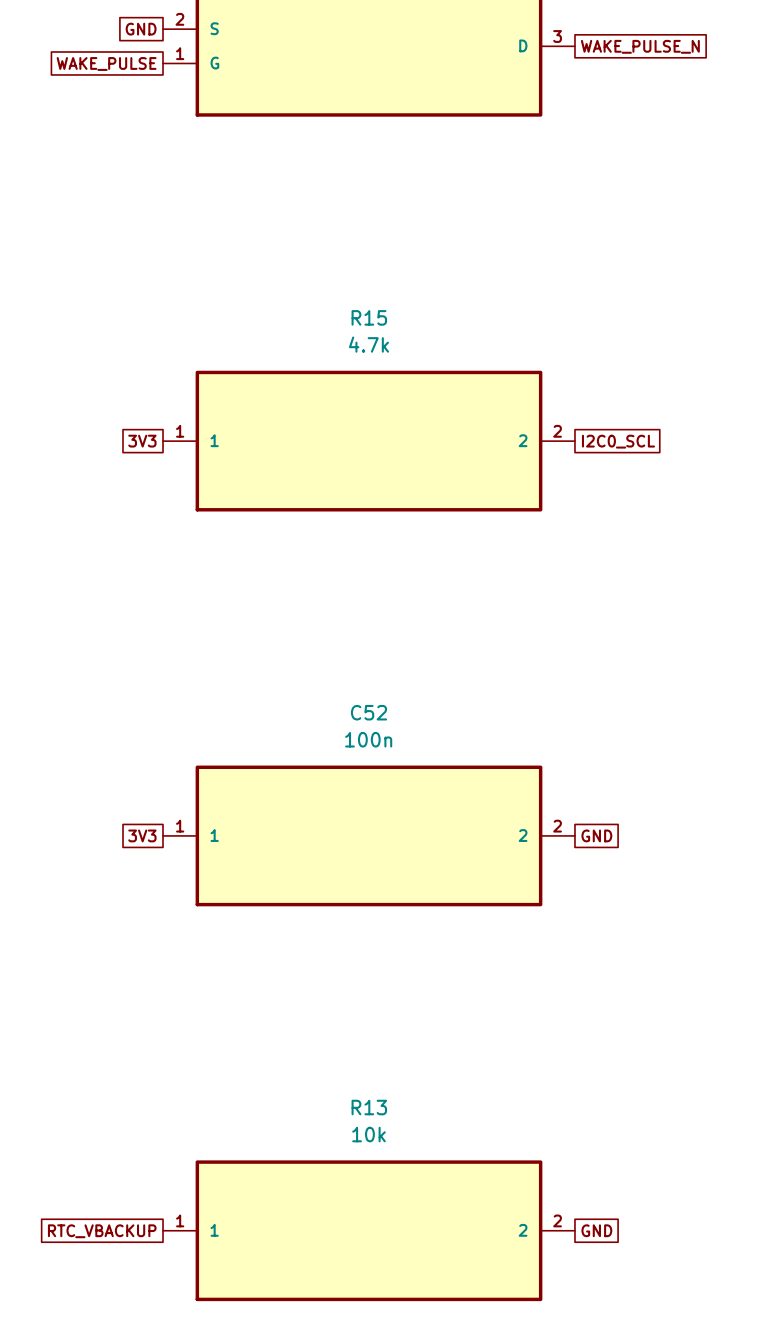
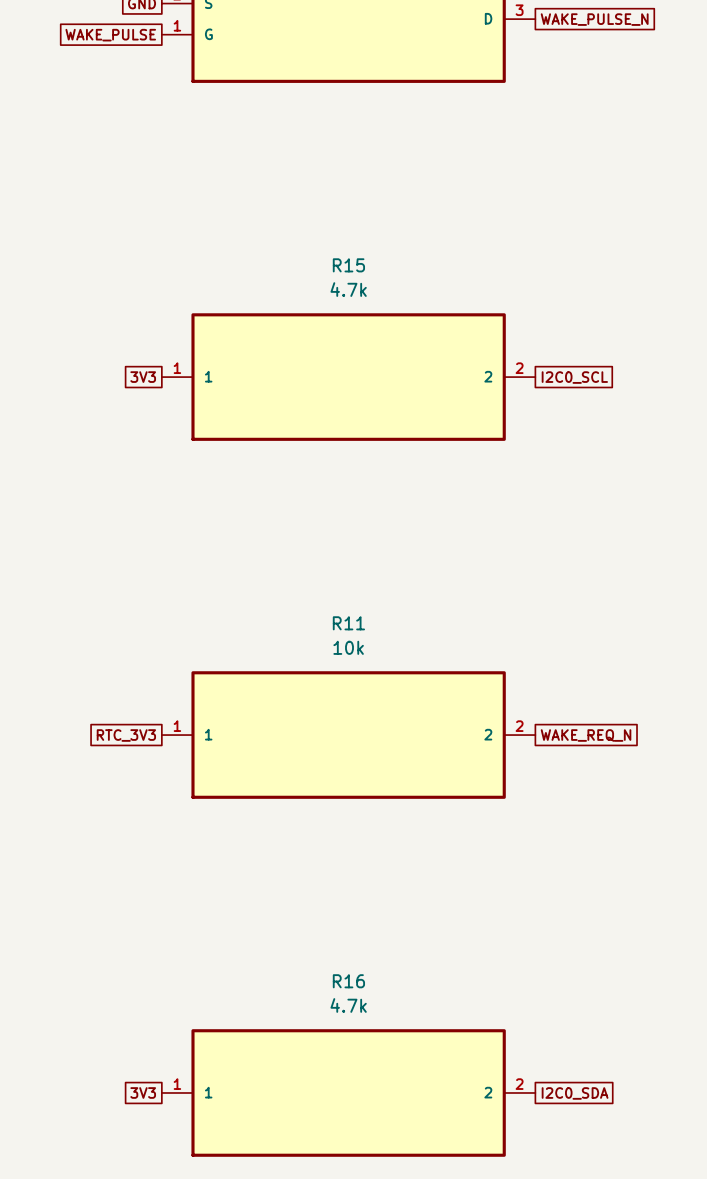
C52 name: C52 (368, 712) -> R11 (348, 623)
C52 value: 100n (368, 739) -> 10k (348, 647)
global label: 3V3 (142, 835) -> RTC_3V3 (126, 735)
global label: GND (596, 835) -> WAKE_REQ_N (586, 735)
R13 name: R13 (369, 1107) -> R16 (348, 981)
R13 value: 10k (368, 1134) -> 4.7k (348, 1005)
global label: GND (596, 1230) -> I2C0_SDA (575, 1093)
global label: RTC_VBACKUP (102, 1231) -> 3V3 (143, 1092)

